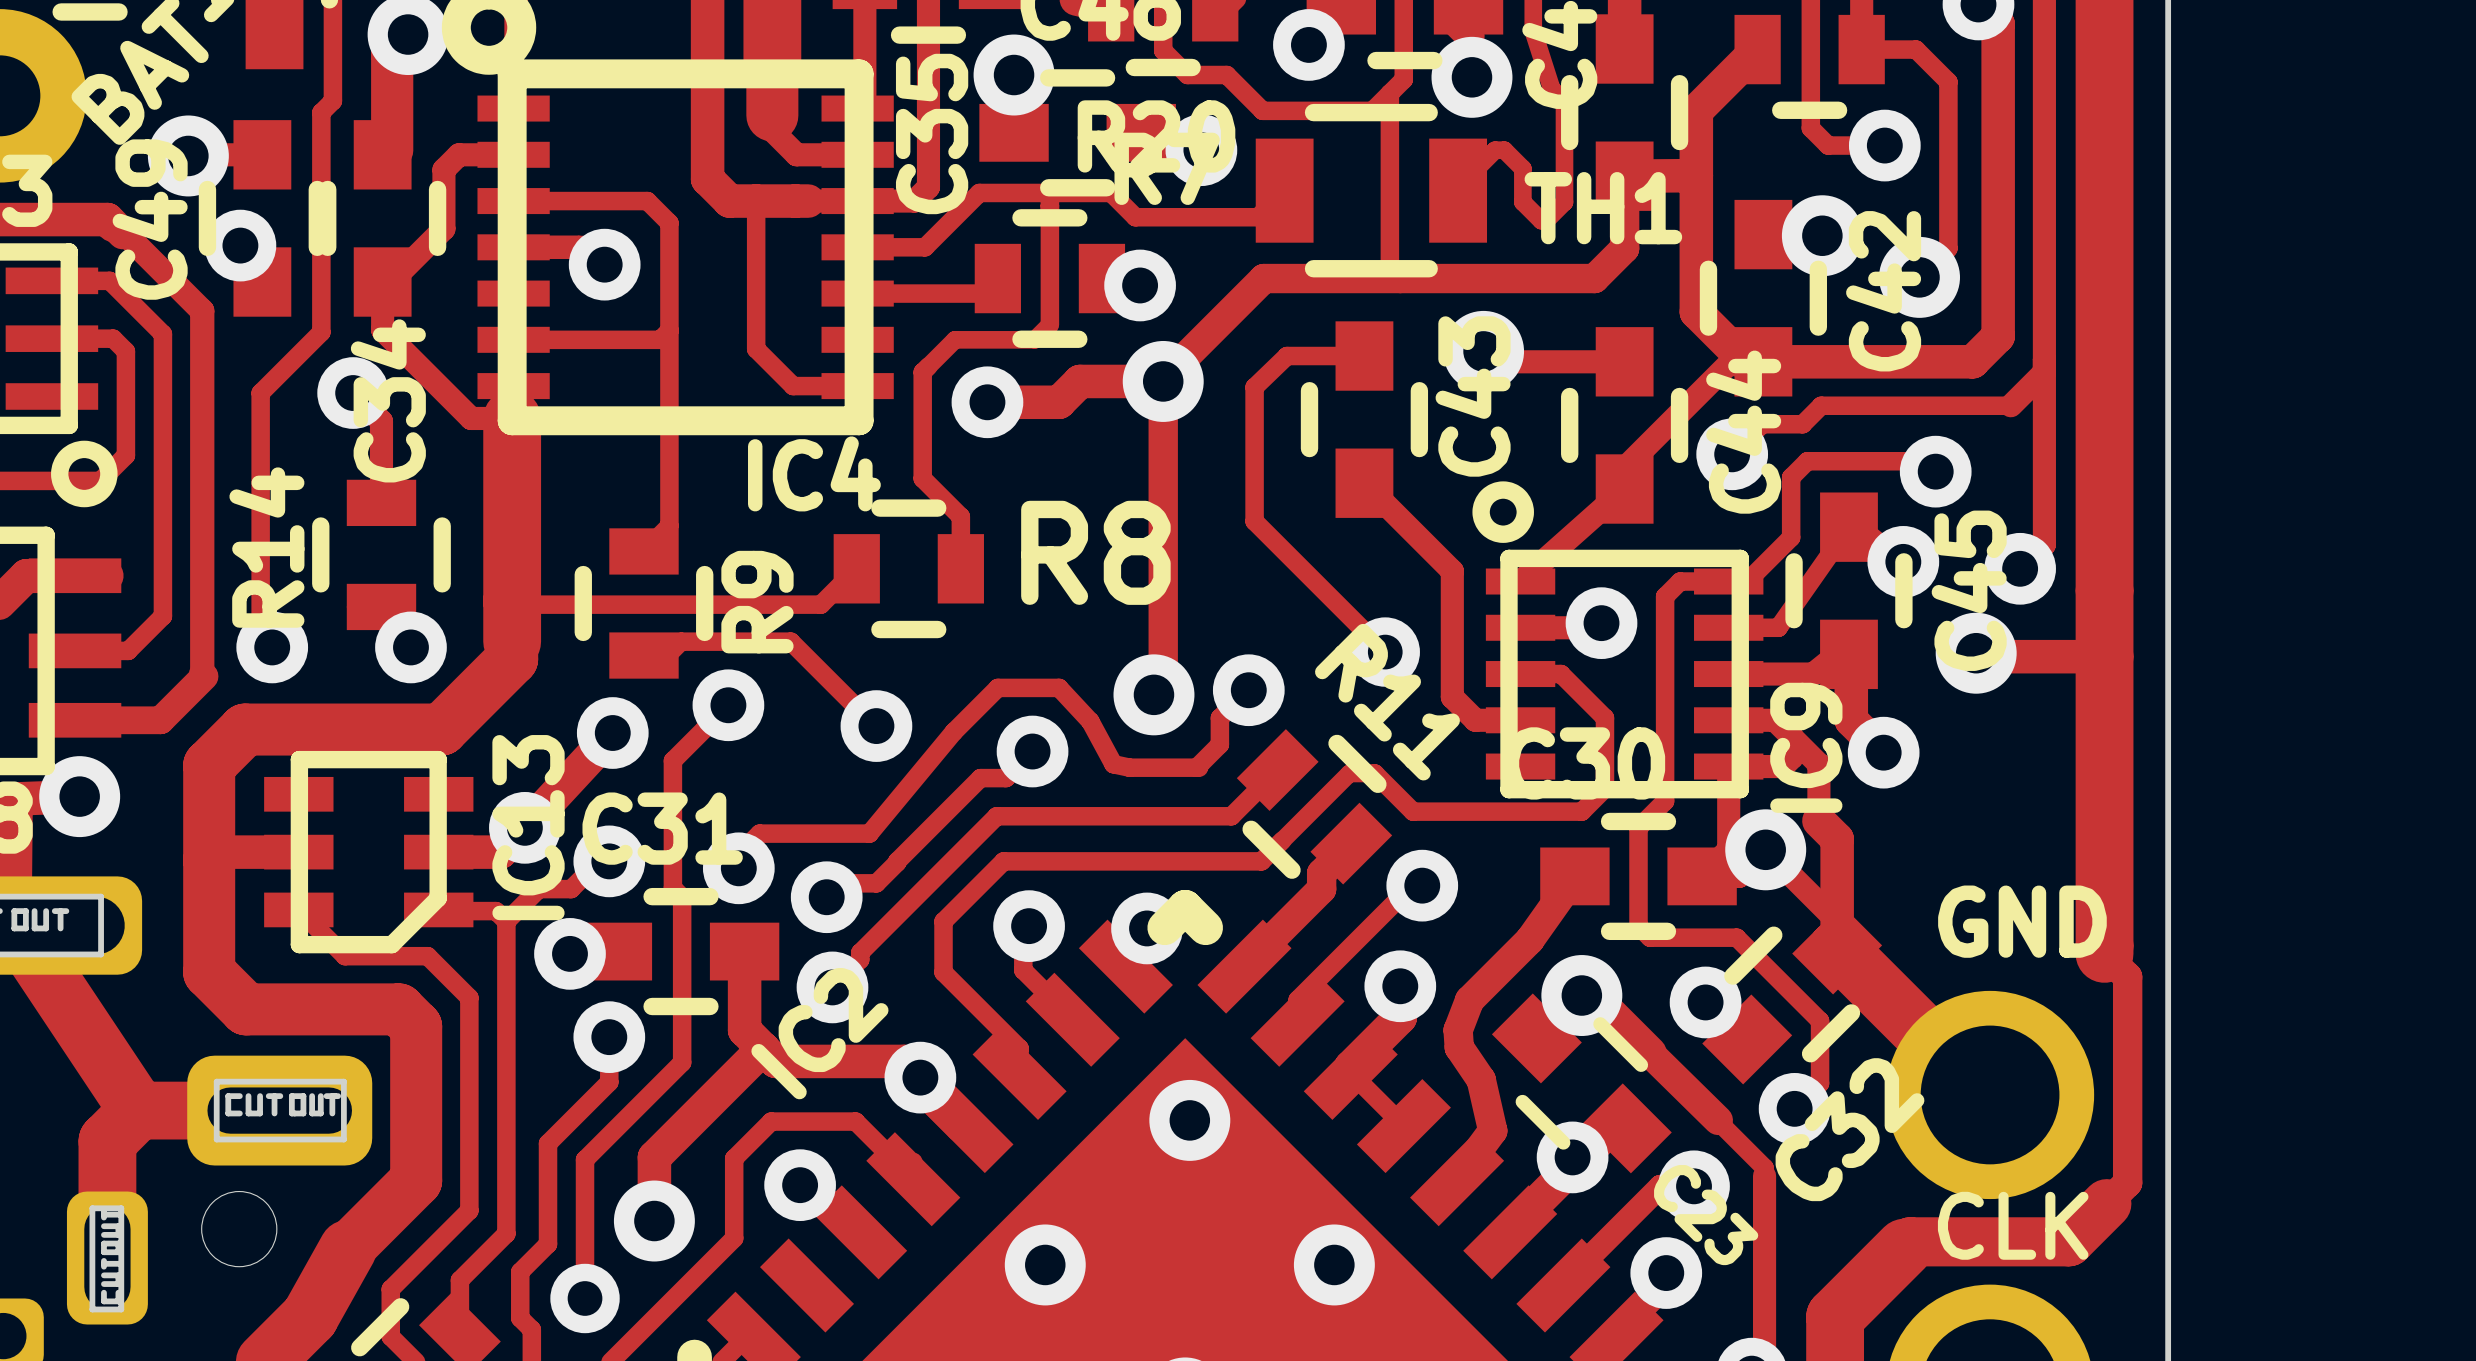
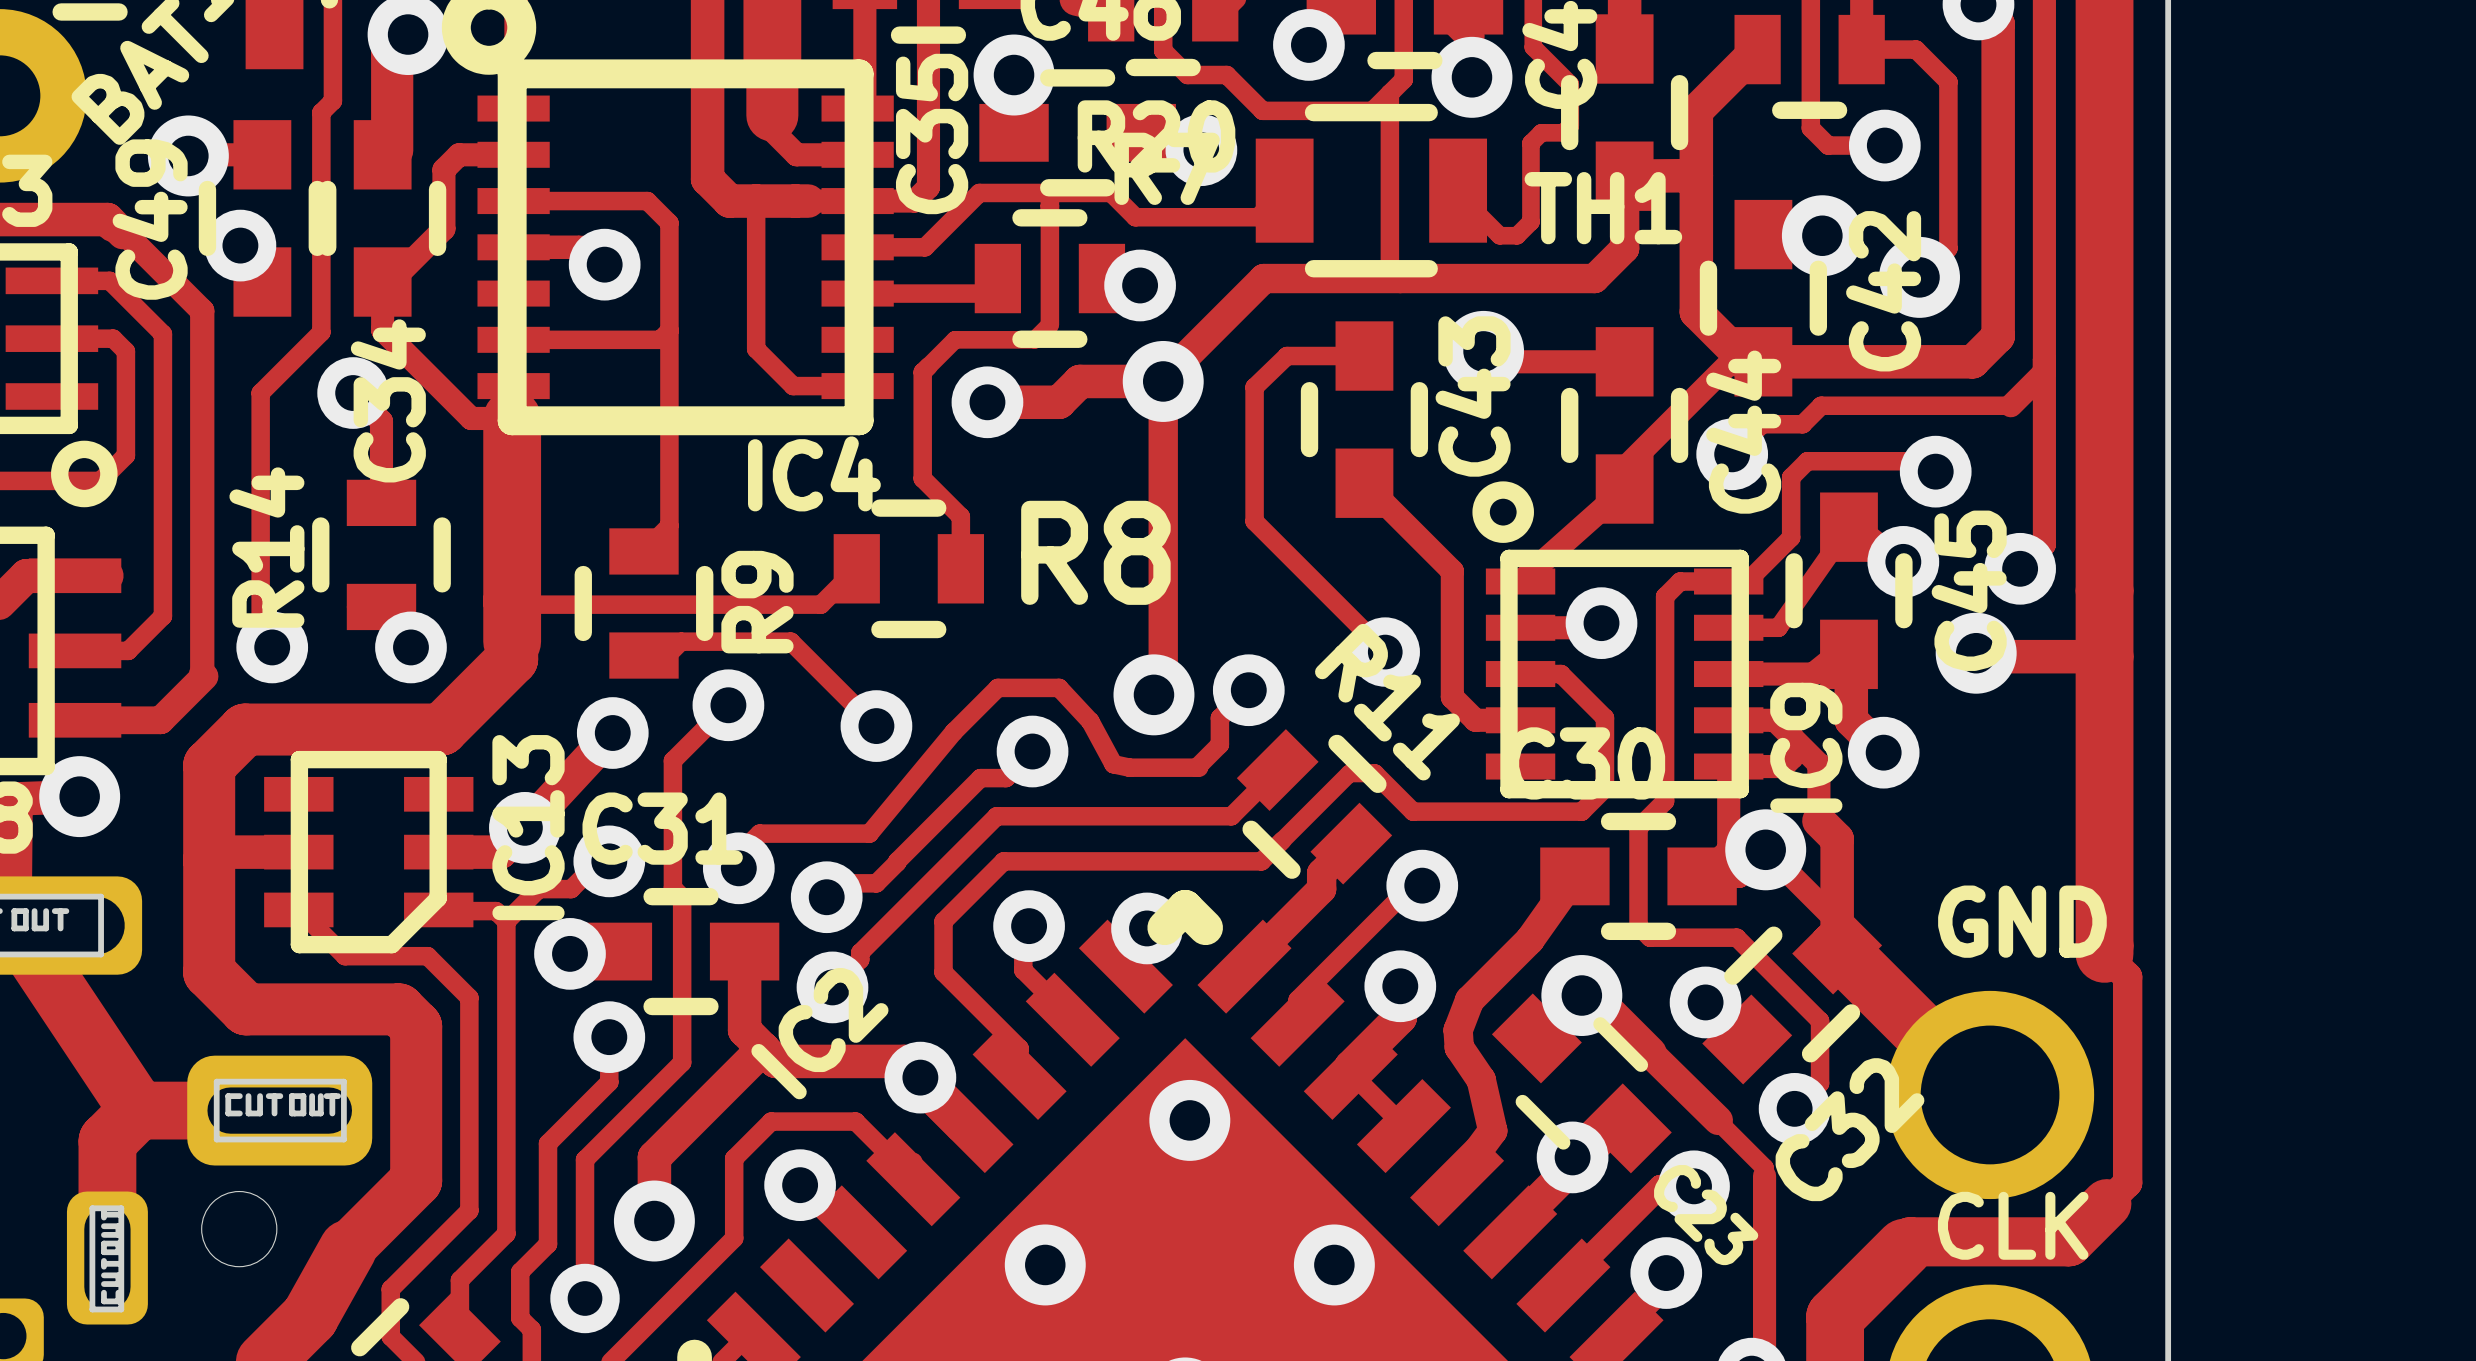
track: (1533, 31) (1551, 88) (1564, 101) (1564, 202) (1546, 220) (1541, 220) (1522, 202) (1522, 168) (1504, 150) (1495, 150) (1458, 187) -> (1533, 31) (1533, 47) (1570, 84) (1570, 125) (1563, 132) (1541, 132) (1530, 143) (1530, 221) (1517, 235) (1499, 235) (1458, 194) (1458, 190)

